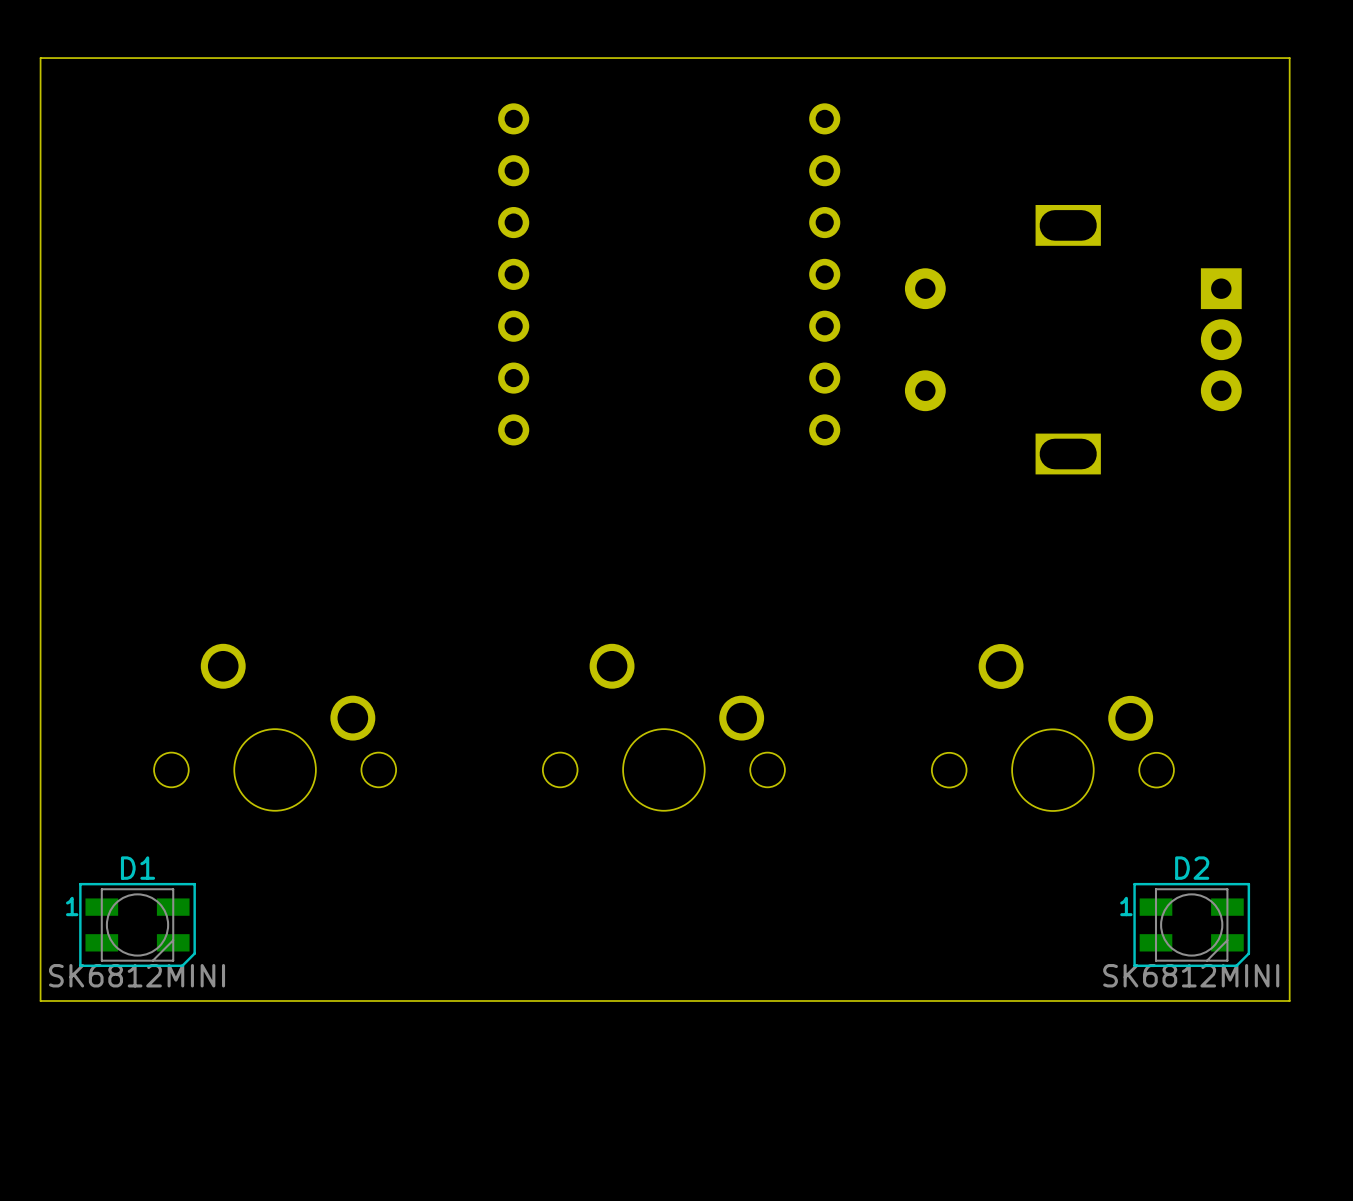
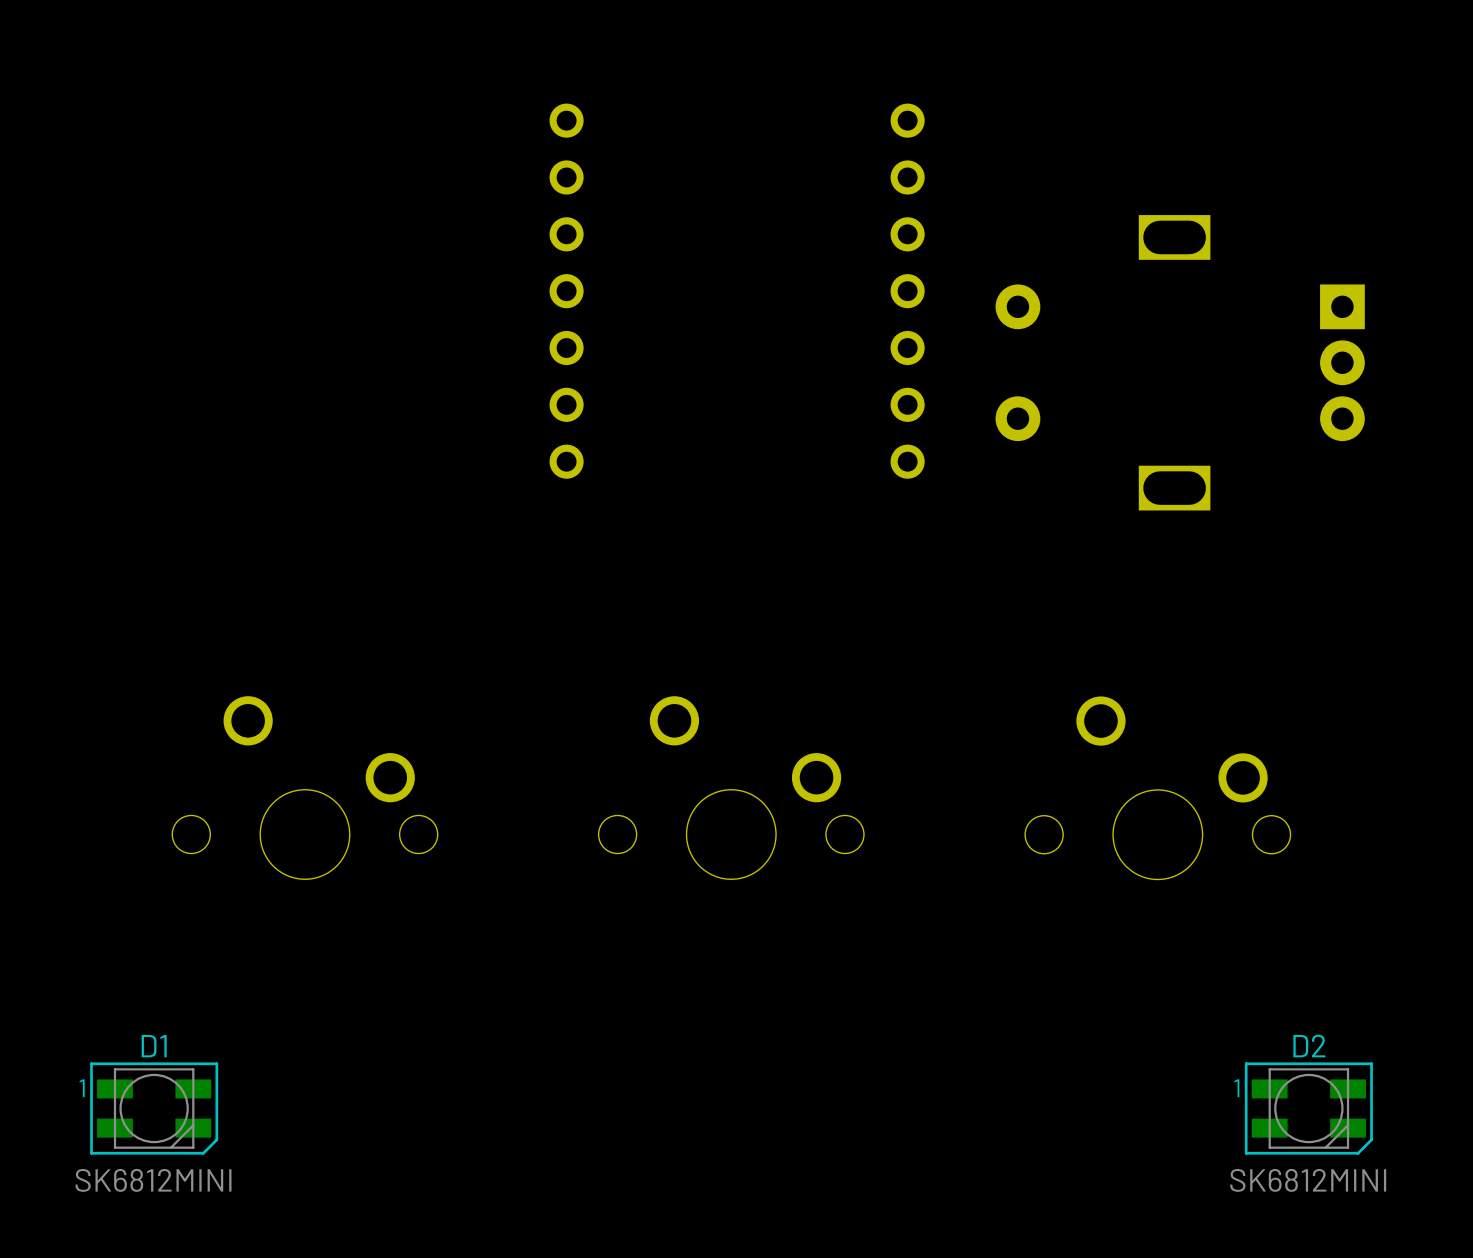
board edge: (1289, 58) (40, 58) (40, 1000) (1289, 1000) (1289, 58) -> none
D1 position: (137, 924) -> (154, 1108)
D2 position: (1191, 924) -> (1308, 1108)
D1 value position: SK6812MINI (137, 975) -> SK6812MINI (153, 1180)
D2 value position: SK6812MINI (1191, 975) -> SK6812MINI (1308, 1180)

